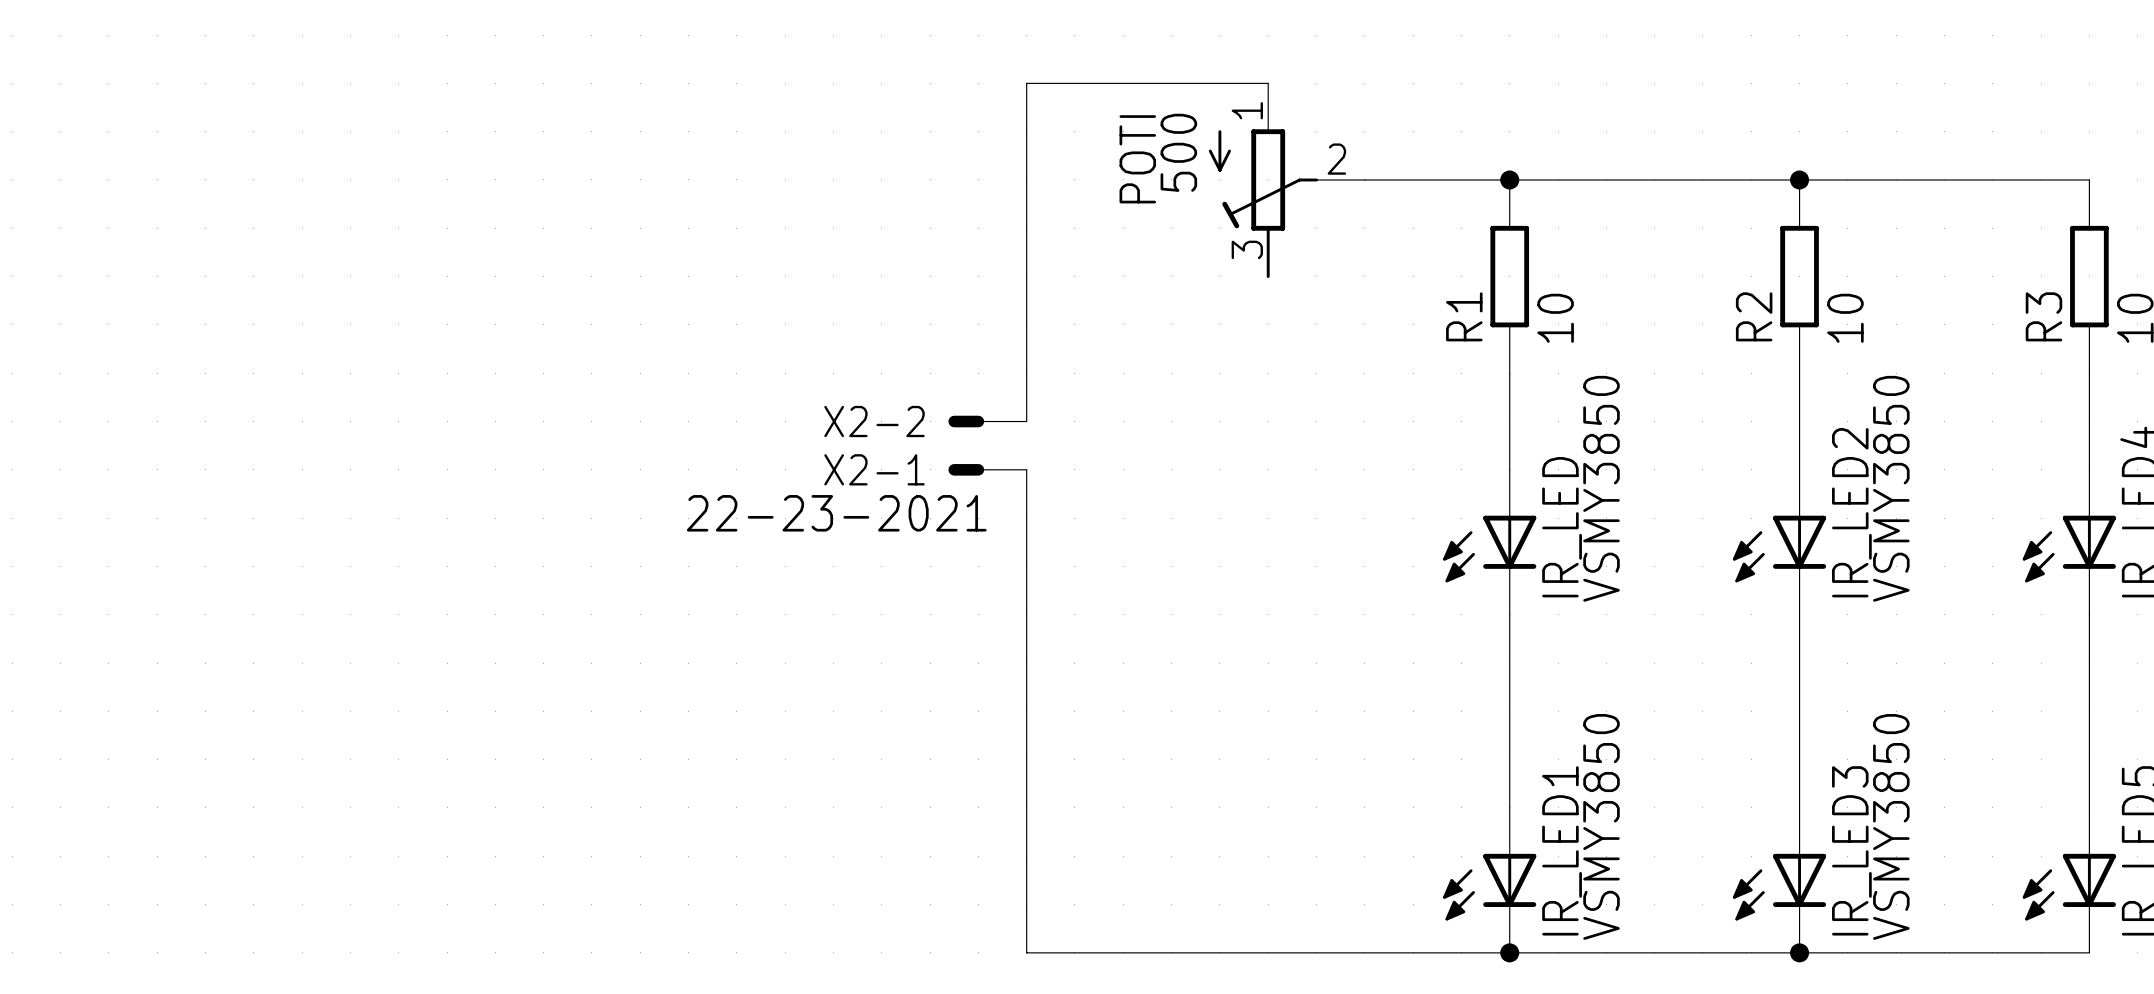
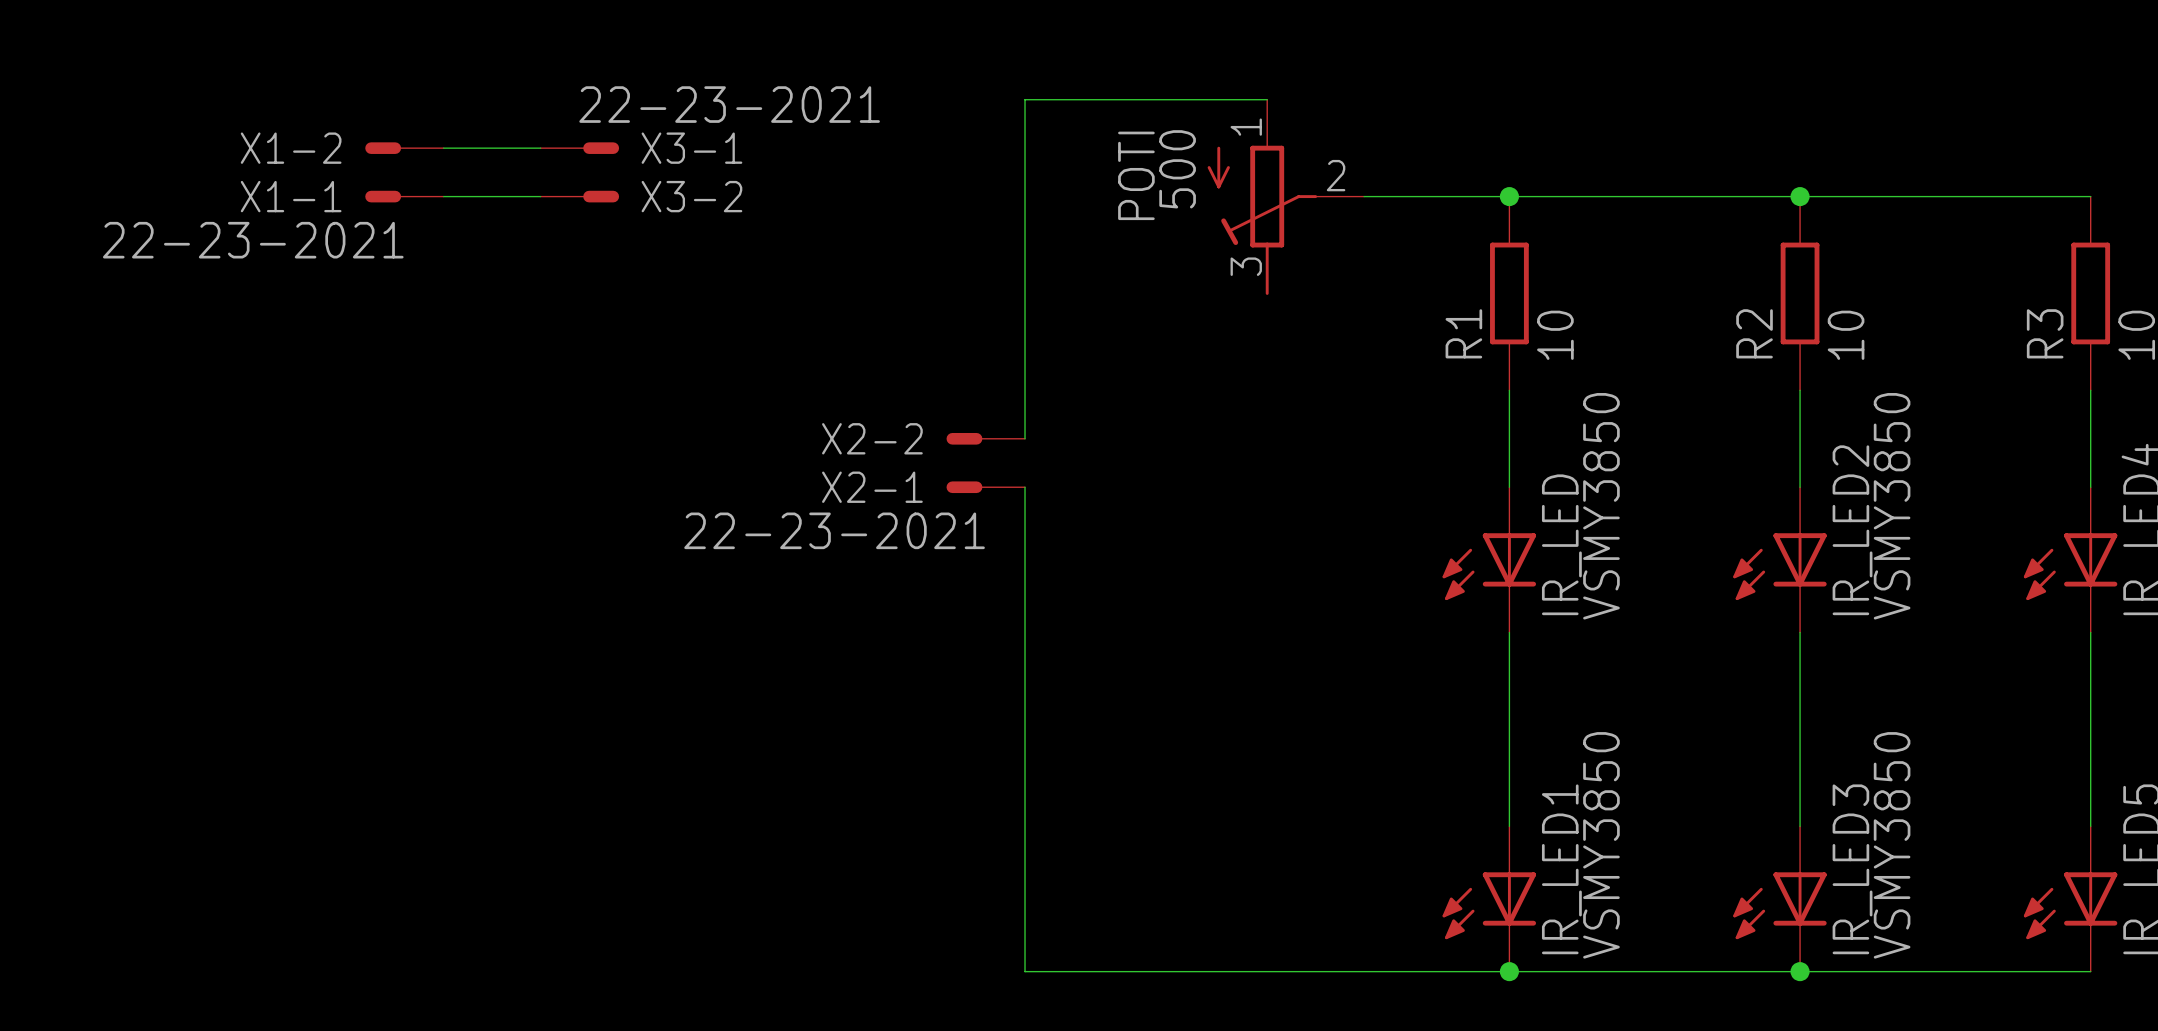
X1-2: none -> (404, 148)
wire: none -> (443, 148) (540, 148)
X3-1: none -> 22-23-2021 (579, 148)
X1-1: none -> 22-23-2021 (404, 196)
wire: none -> (443, 196) (540, 196)
X3-2: none -> (579, 196)

